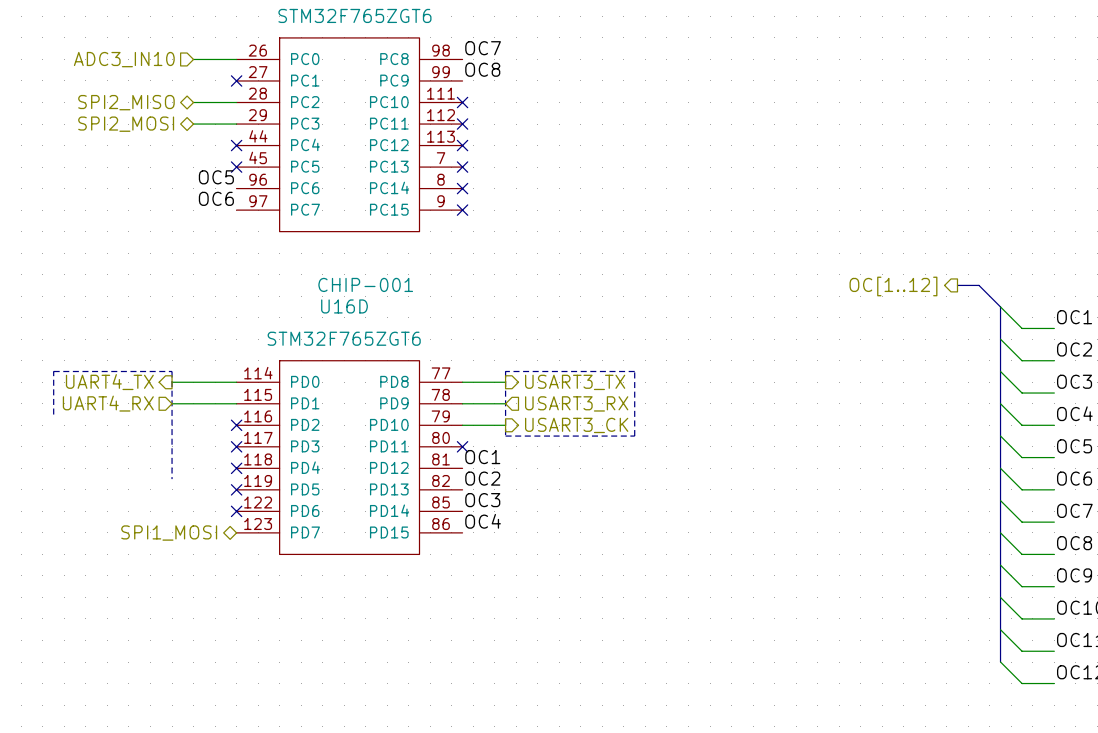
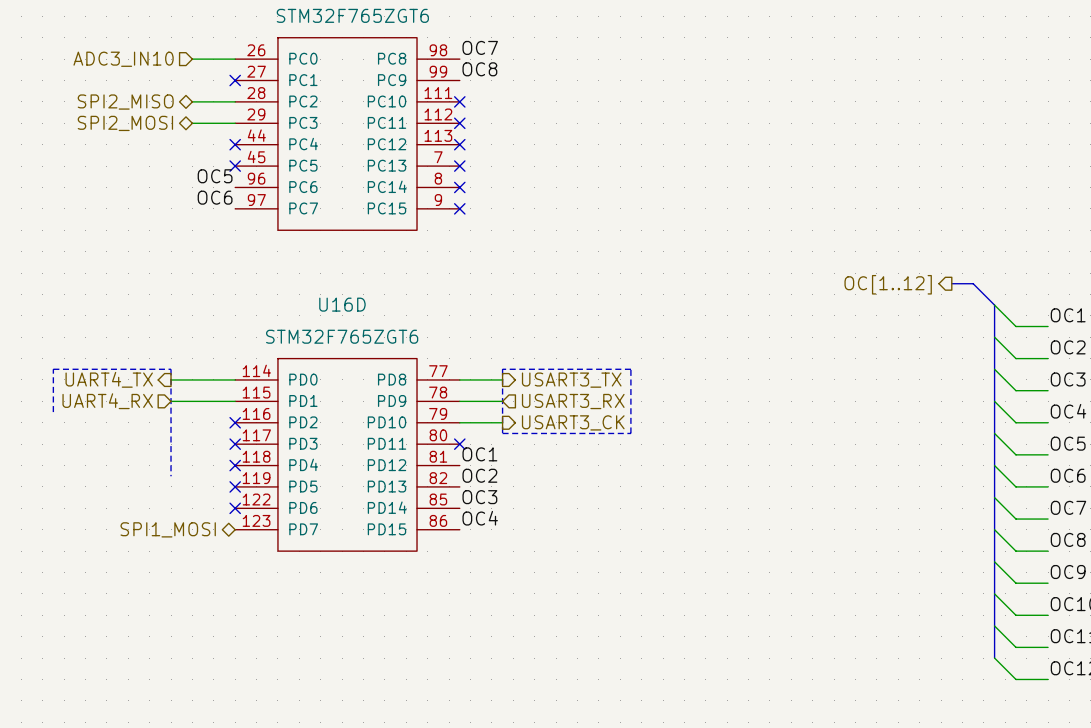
U16D text: CHIP-001 (365, 284) -> none

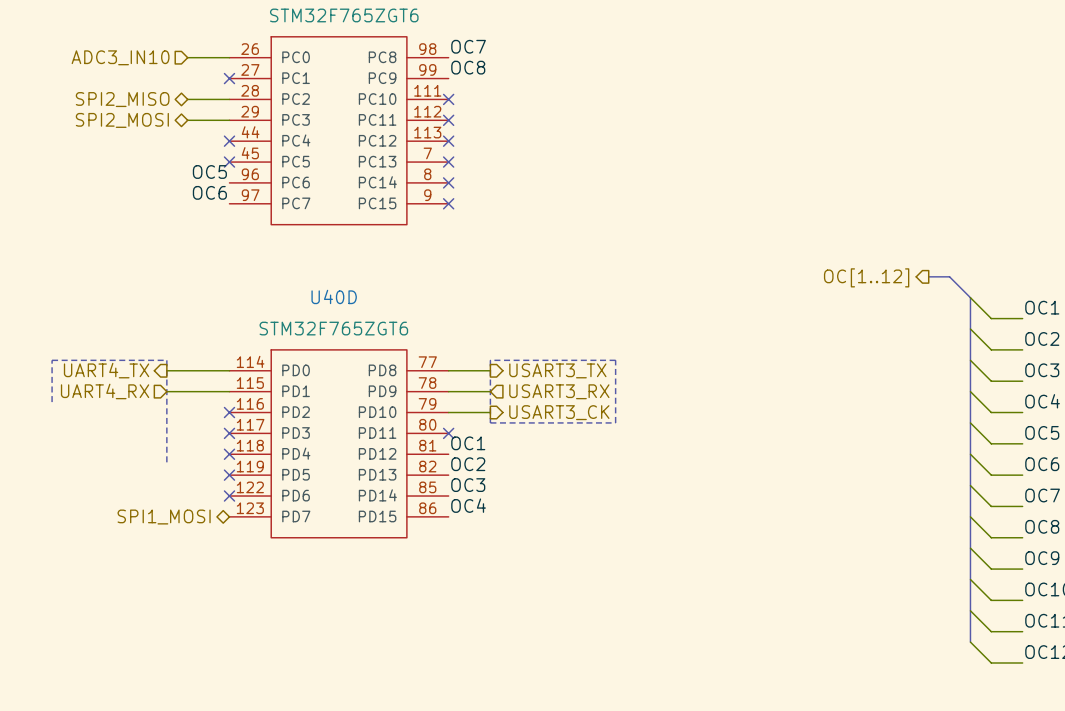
U16D name: U16D (342, 304) -> U40D (334, 296)

